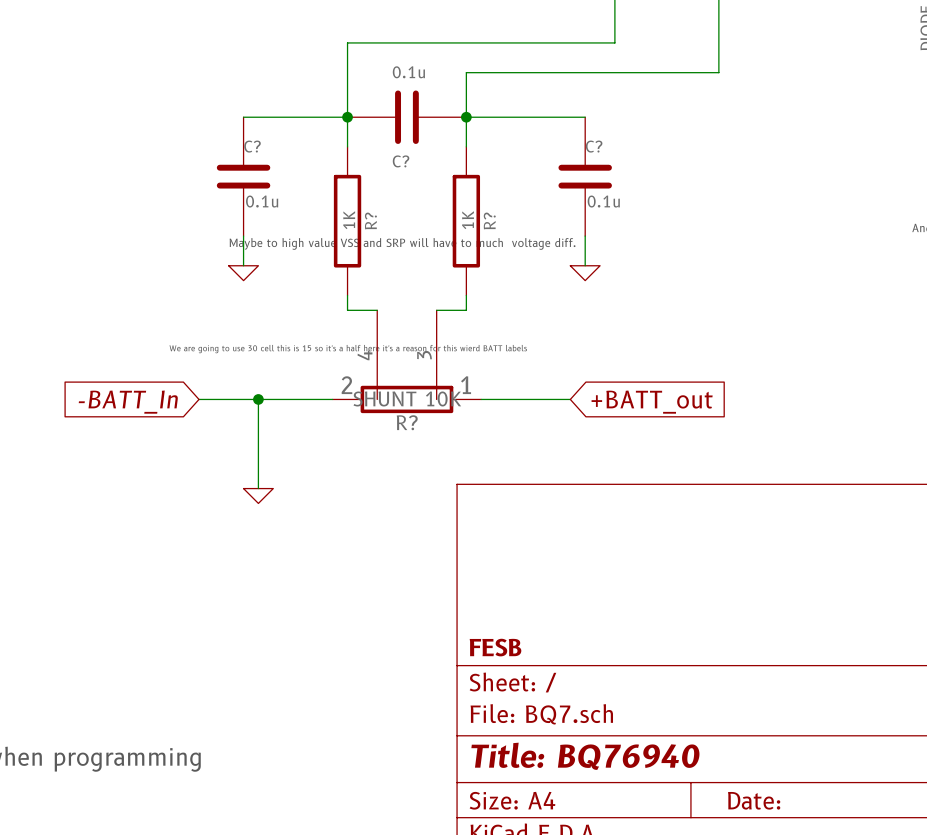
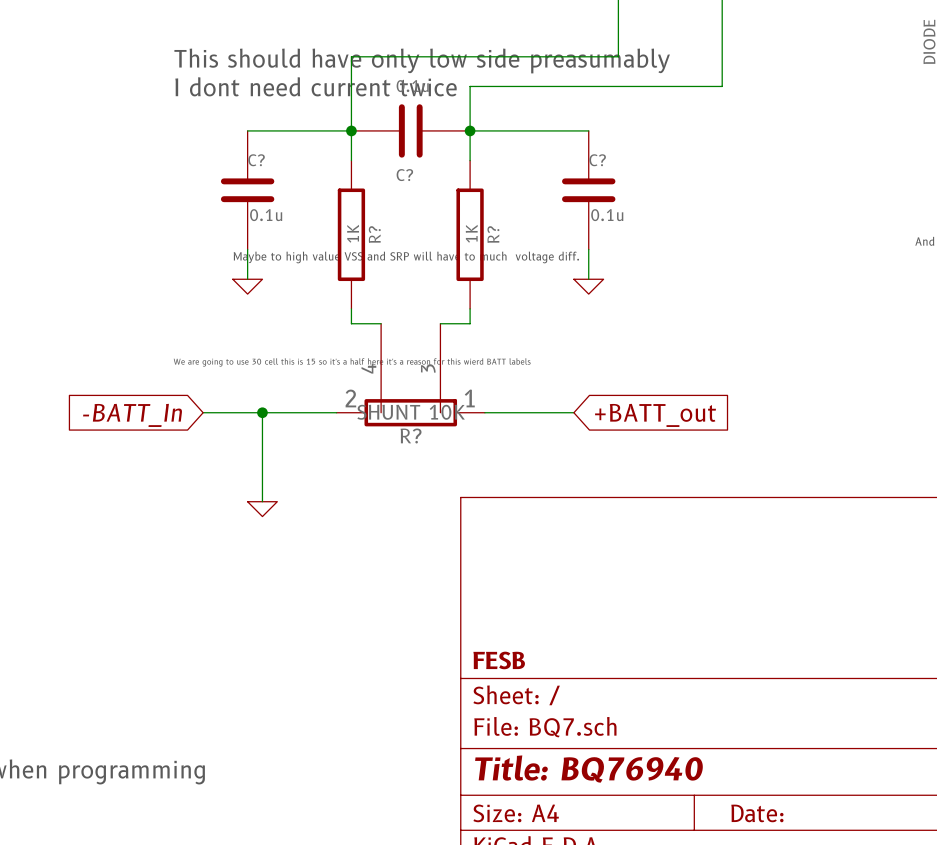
text: none -> This should have only low side preasumably (422, 60)
text: none -> I dont need current twice (316, 86)

